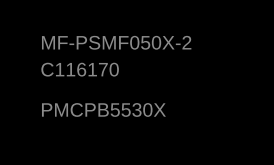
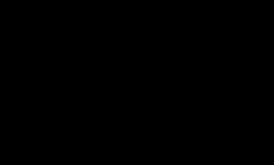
text: MF-PSMF050X-2 (116, 42) -> none
text: C116170 (80, 69) -> none
text: PMCPB5530X (103, 109) -> none

